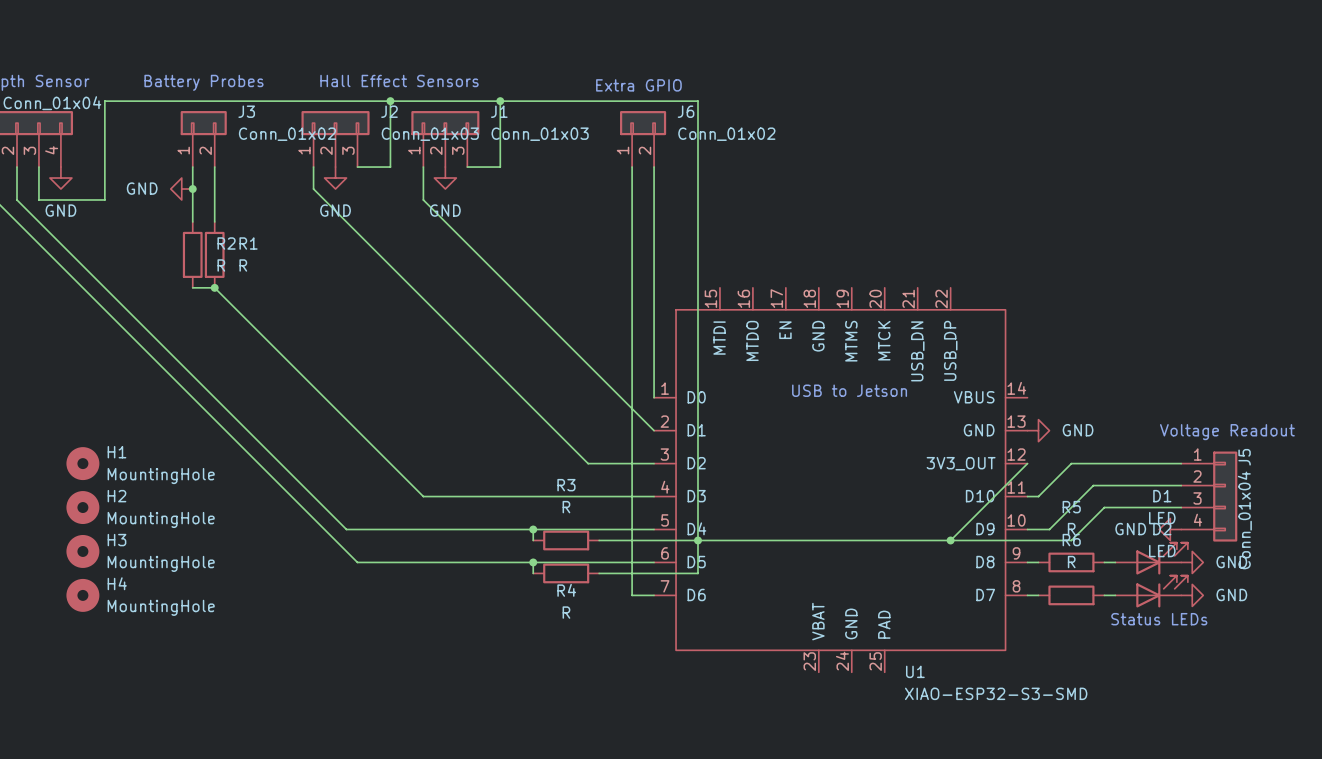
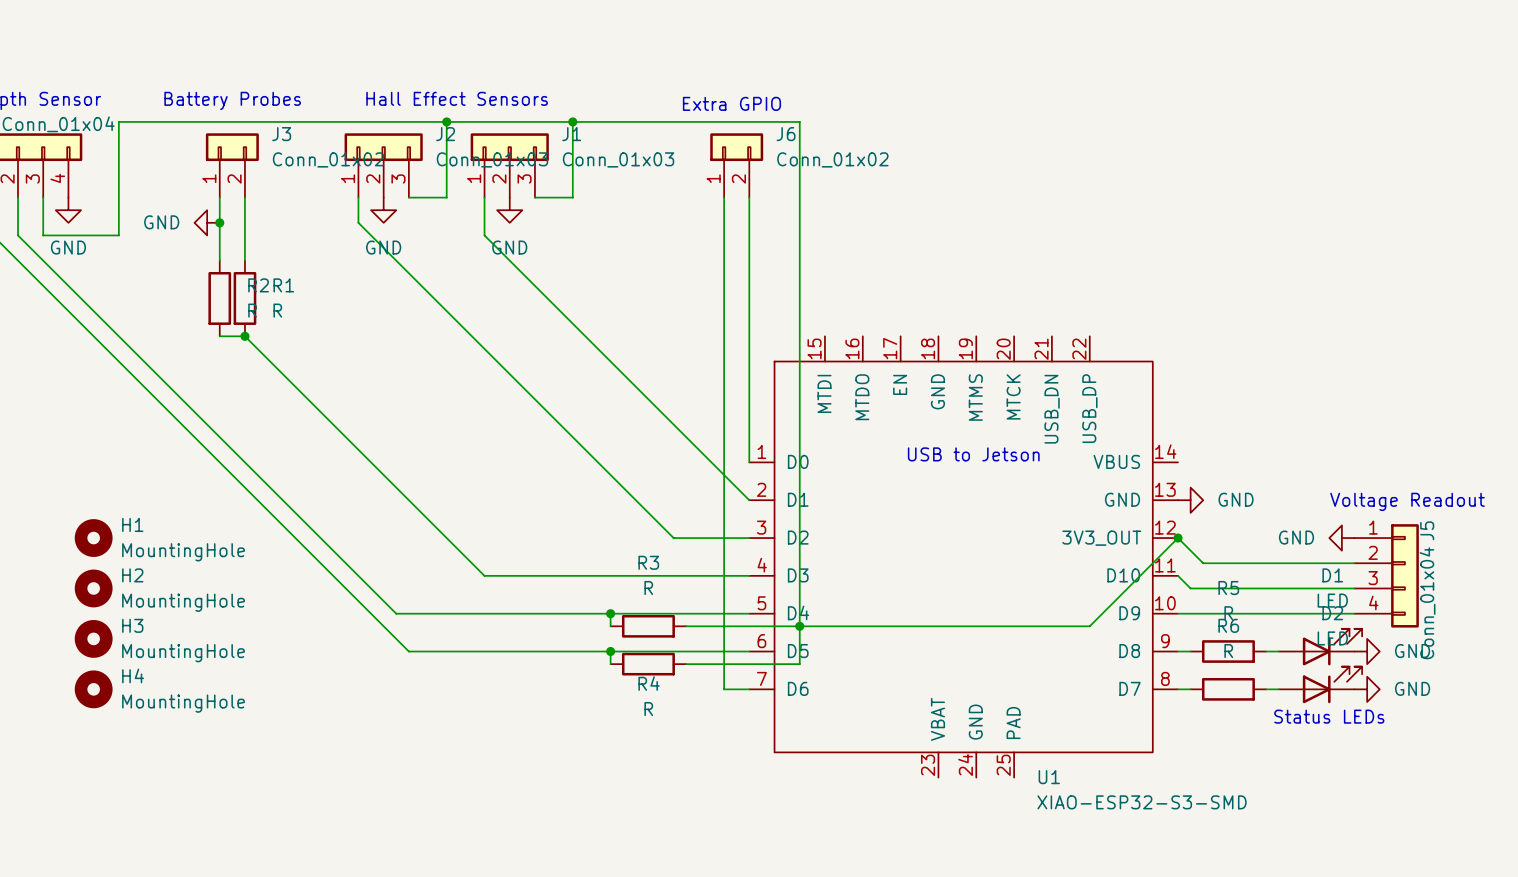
junction: none -> (1178, 538)
wire: (1181, 463) (1071, 463) (1038, 496) (1027, 496) -> (1266, 588) (1190, 588) (1178, 575)
wire: (1093, 485) (1049, 529) -> (1253, 563) (1203, 563) (1178, 538)
wire: (1104, 507) (1071, 540) (950, 540) -> none
wire: none -> (1203, 613) (1354, 613)
power symbol position: GND (1170, 529) -> GND (1341, 538)
junction: (950, 540) -> none

